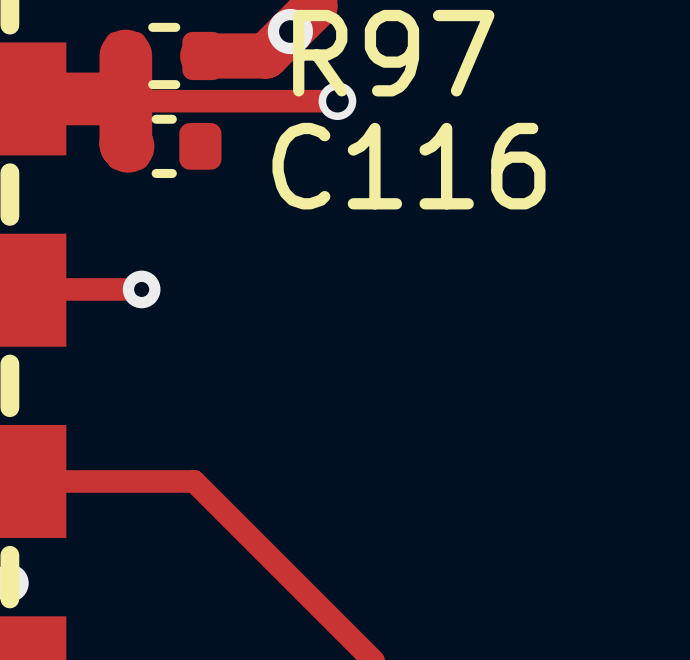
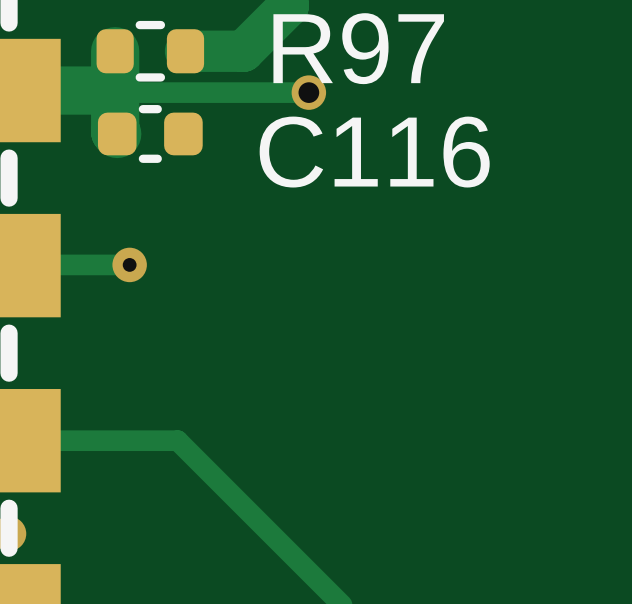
via: (290, 31) -> none

